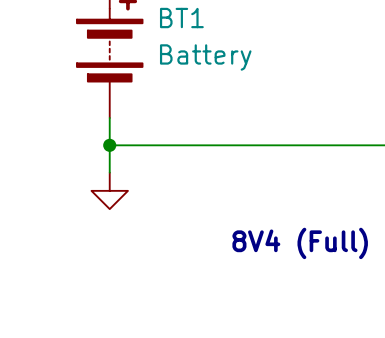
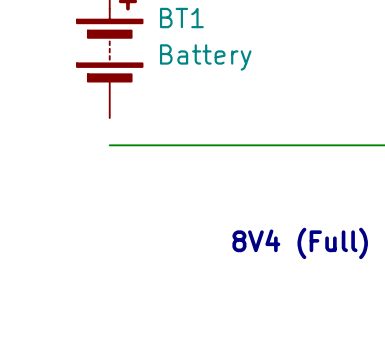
wire: (109, 118) (109, 172) -> none
junction: (109, 145) -> none
power symbol: (109, 190) -> none

